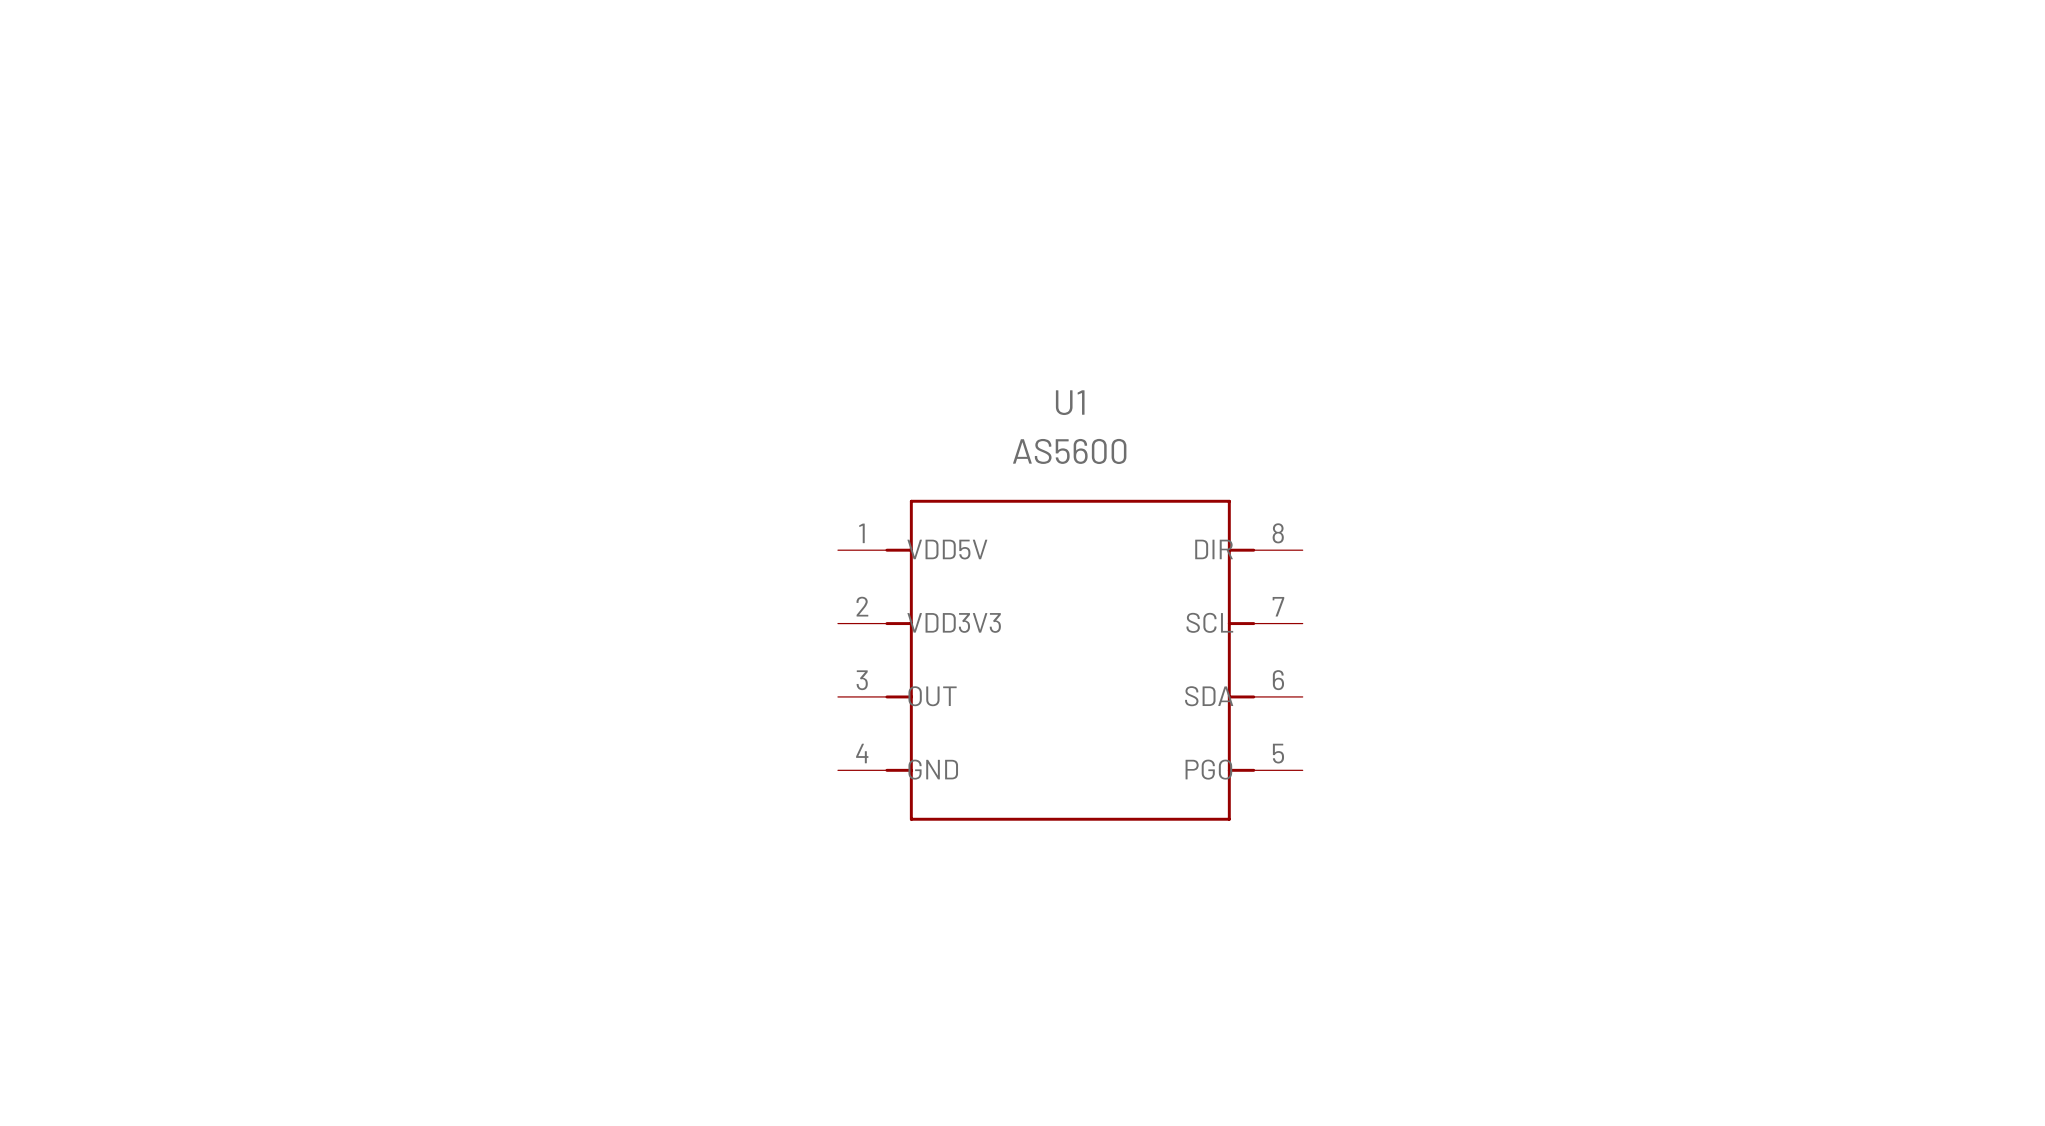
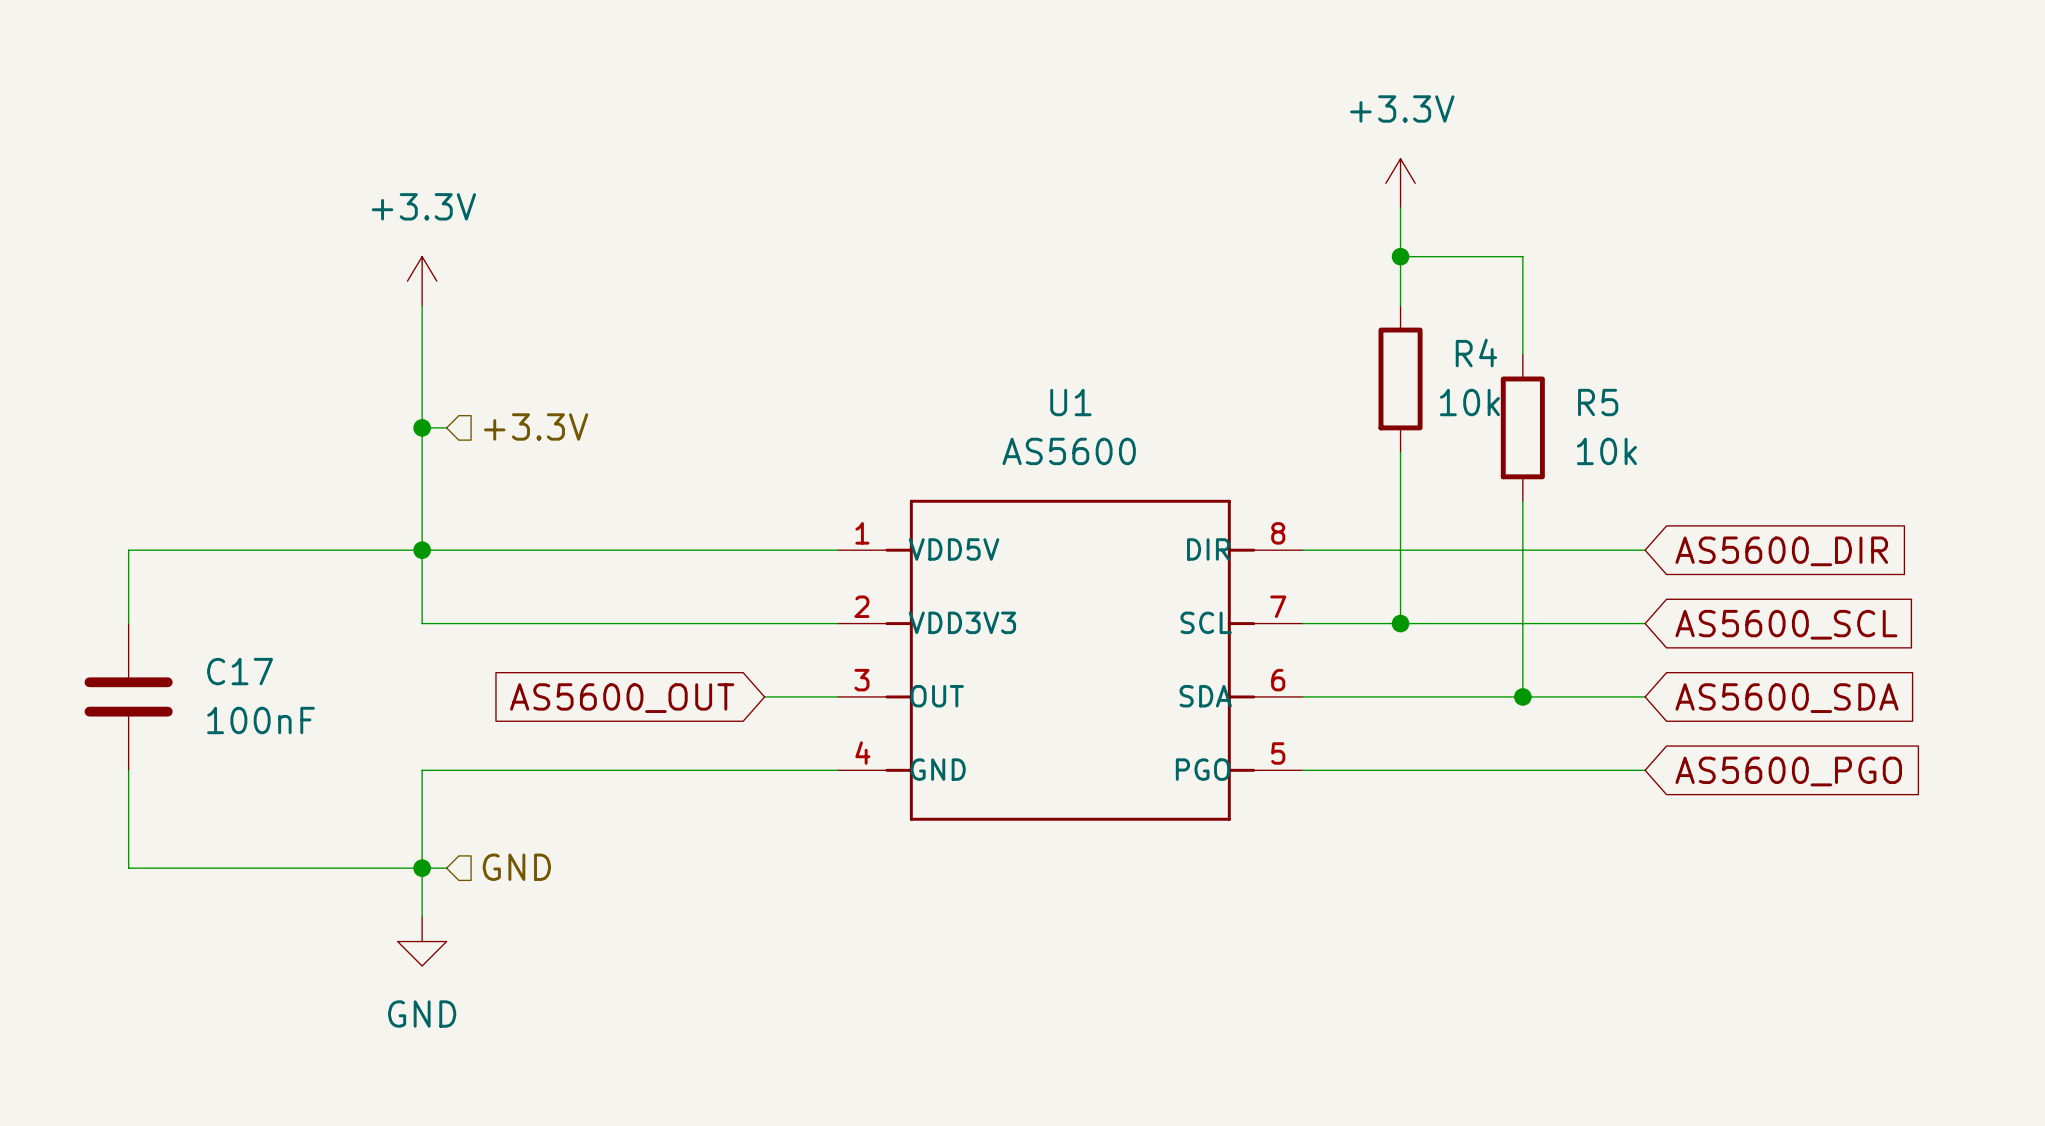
power symbol: none -> +3.3V (1400, 183)
wire: none -> (1400, 207) (1400, 305)
wire: none -> (1400, 256) (1522, 256) (1522, 354)
junction: none -> (1400, 256)
power symbol: none -> +3.3V (422, 281)
wire: none -> (422, 305) (422, 623) (837, 623)
R4: none -> 10k (1400, 378)
wire: none -> (422, 427) (446, 427)
junction: none -> (422, 427)
hierarchical label: none -> +3.3V (536, 426)
R5: none -> 10k (1522, 427)
wire: none -> (1400, 452) (1400, 623)
wire: none -> (1522, 501) (1522, 696)
junction: none -> (422, 550)
wire: none -> (837, 550) (128, 550) (128, 623)
wire: none -> (1302, 550) (1645, 550)
global label: none -> AS5600_DIR (1781, 551)
wire: none -> (1302, 623) (1645, 623)
junction: none -> (1400, 623)
global label: none -> AS5600_SCL (1786, 624)
C17: none -> 100nF (128, 696)
global label: none -> AS5600_OUT (622, 698)
wire: none -> (764, 696) (837, 696)
wire: none -> (1302, 696) (1645, 696)
junction: none -> (1522, 696)
global label: none -> AS5600_SDA (1786, 698)
wire: none -> (128, 770) (128, 868) (446, 868)
wire: none -> (837, 770) (422, 770) (422, 917)
wire: none -> (1302, 770) (1645, 770)
global label: none -> AS5600_PGO (1788, 771)
hierarchical label: none -> GND (516, 867)
junction: none -> (422, 868)
power symbol: none -> GND (422, 941)

